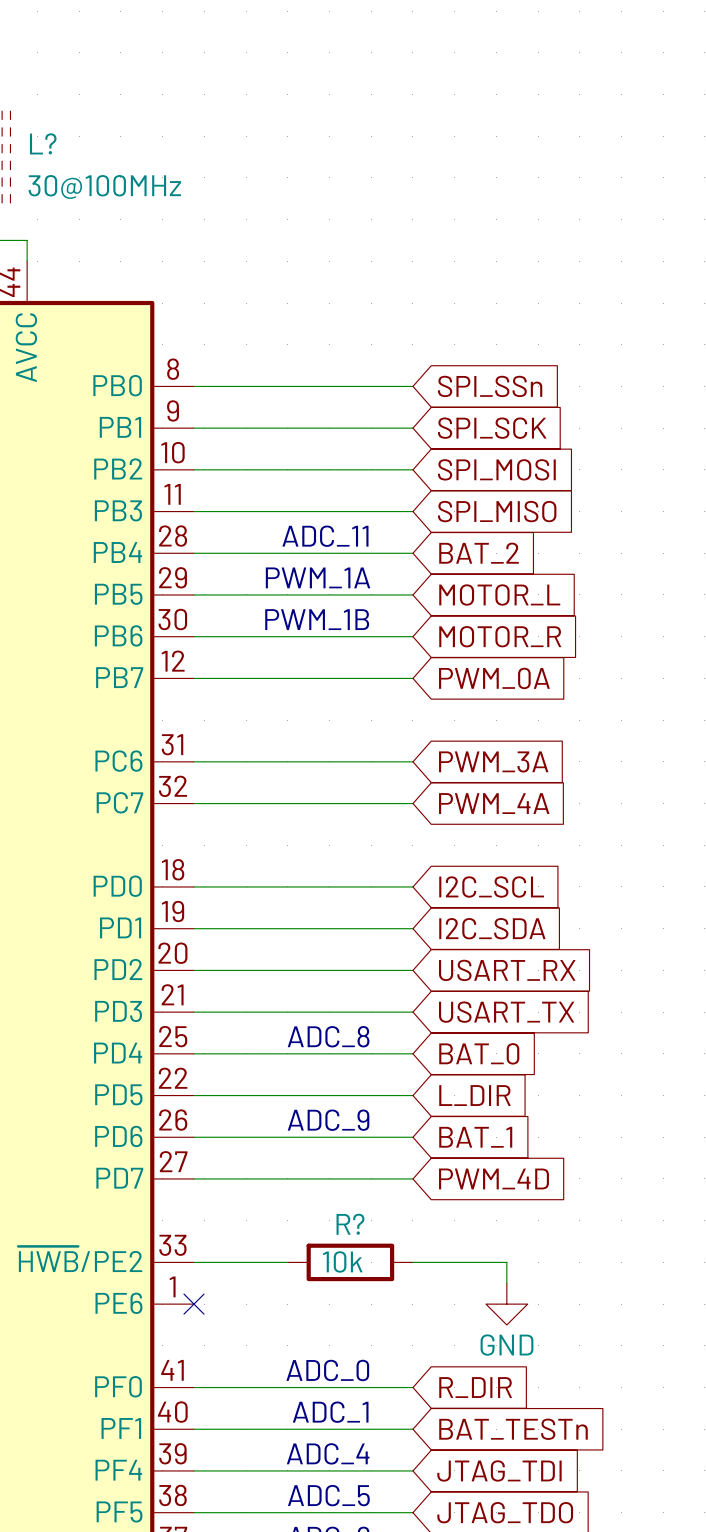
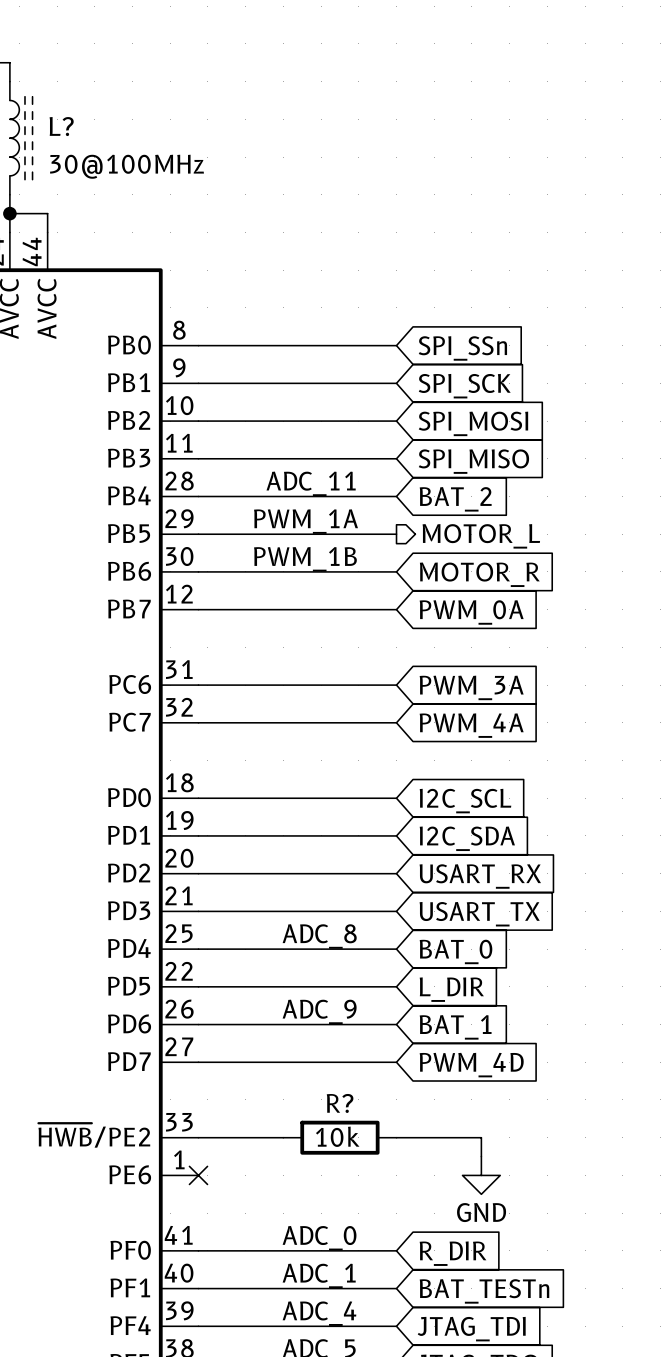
global label: MOTOR_L (499, 594) -> none
hierarchical label: none -> MOTOR_L (481, 536)

